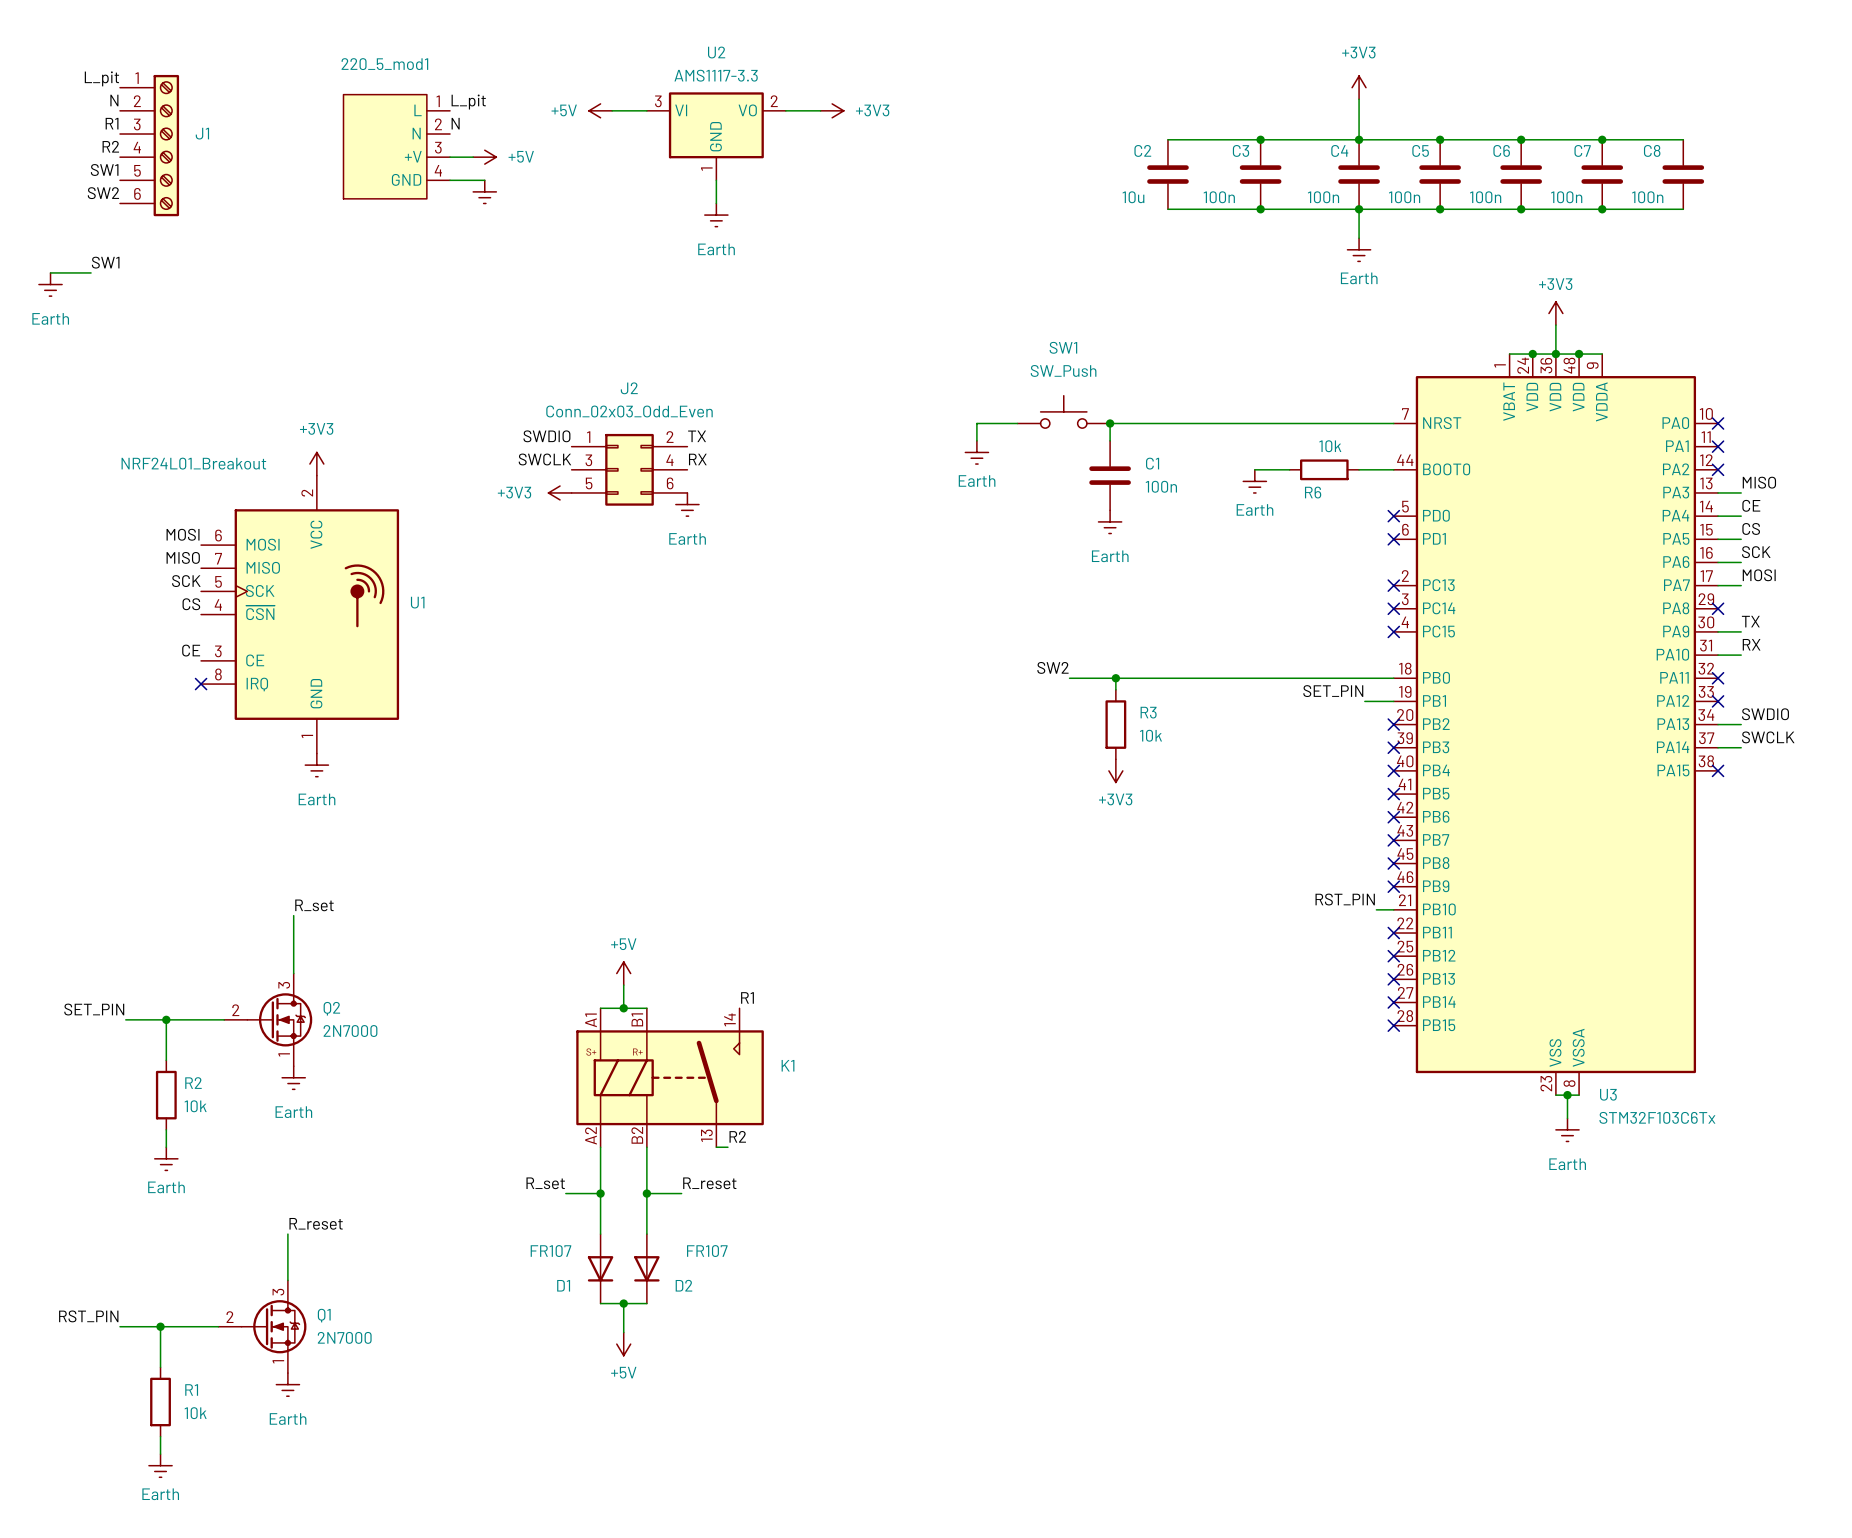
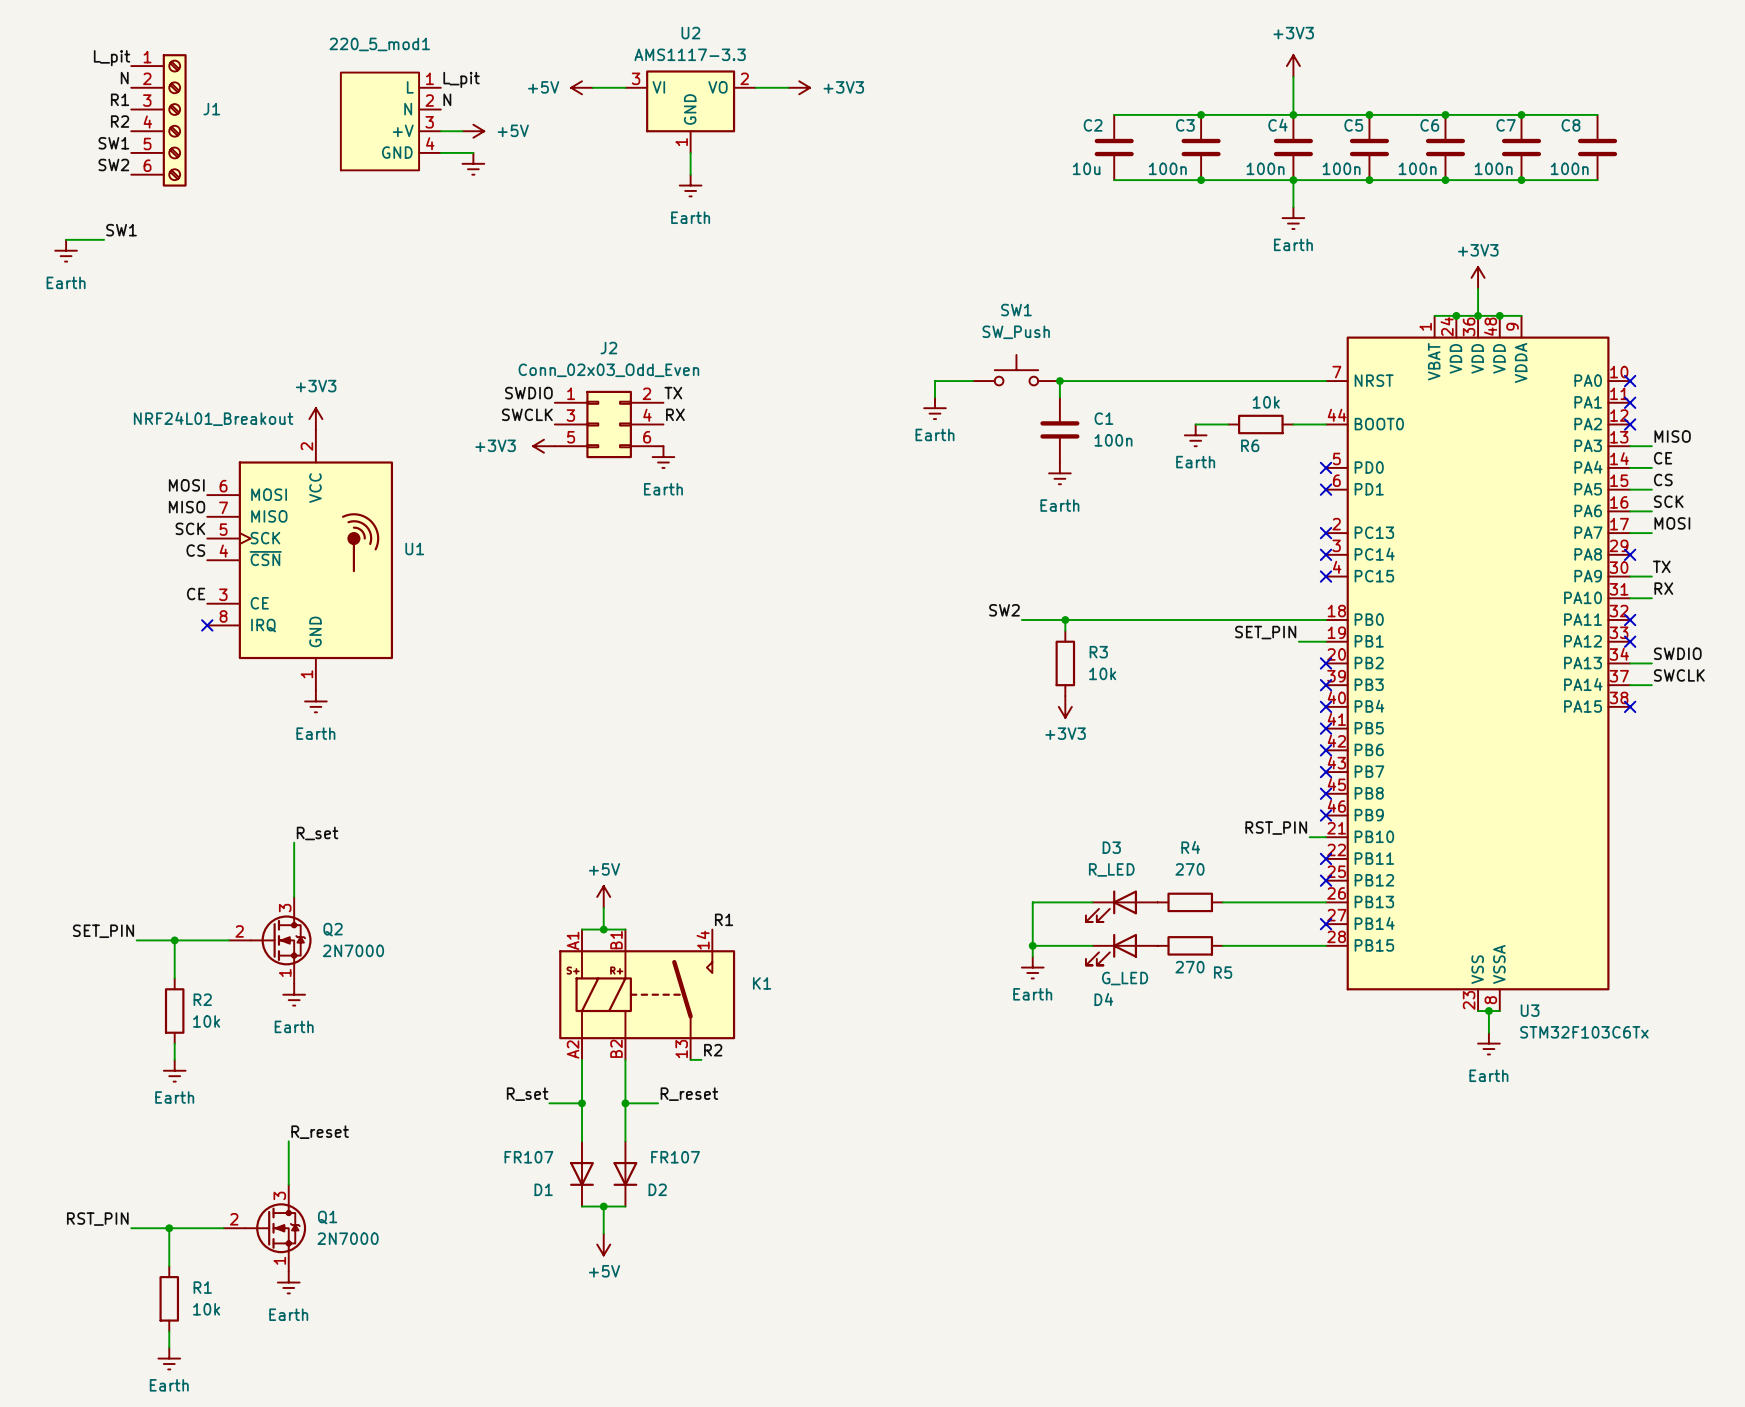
wire: none -> (1092, 902) (1032, 902) (1032, 956)
R4: none -> 270 (1190, 902)
wire: none -> (1222, 902) (1326, 902)
no-connect mark: (1393, 979) -> none
D3: none -> R_LED (1121, 906)
wire: none -> (1032, 945) (1092, 945)
junction: none -> (1032, 945)
R5: none -> 270 (1190, 945)
wire: none -> (1222, 945) (1326, 945)
no-connect mark: (1393, 1025) -> none
D4: none -> G_LED (1121, 949)
power symbol: none -> Earth (1032, 967)

